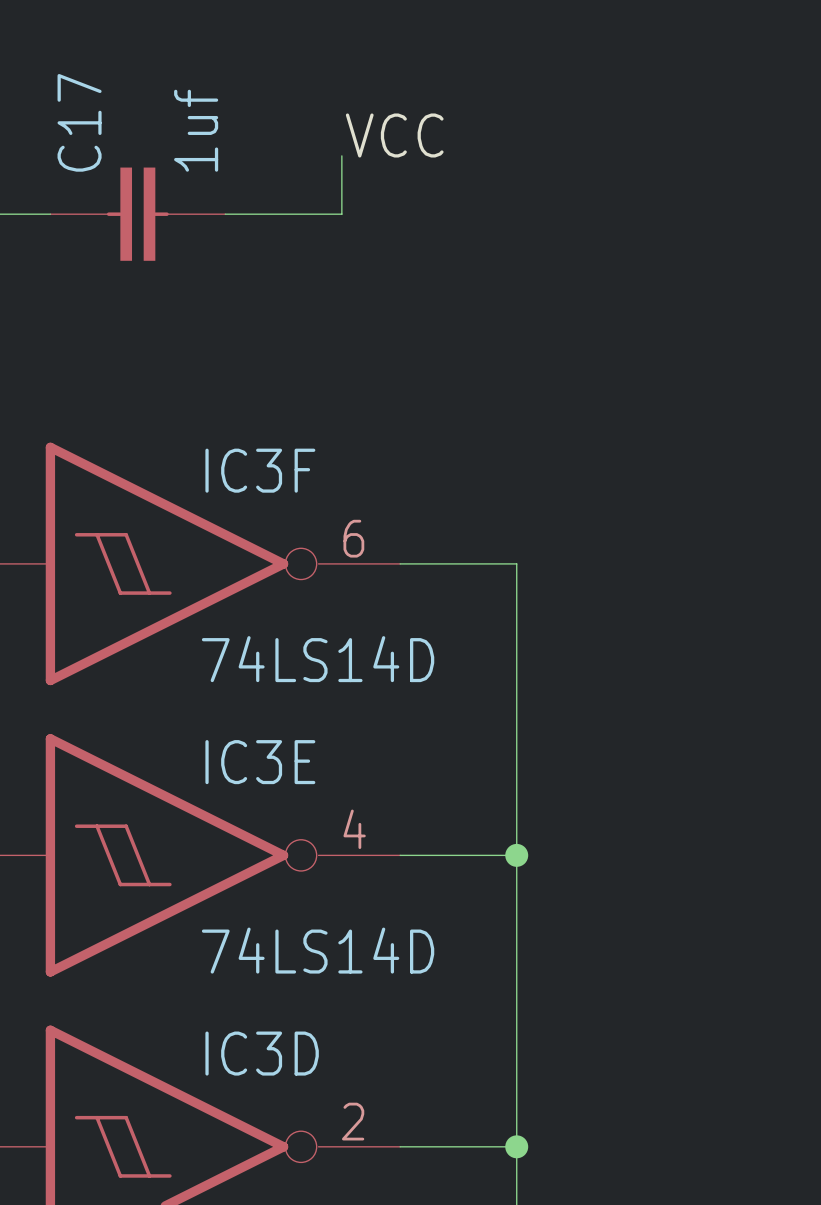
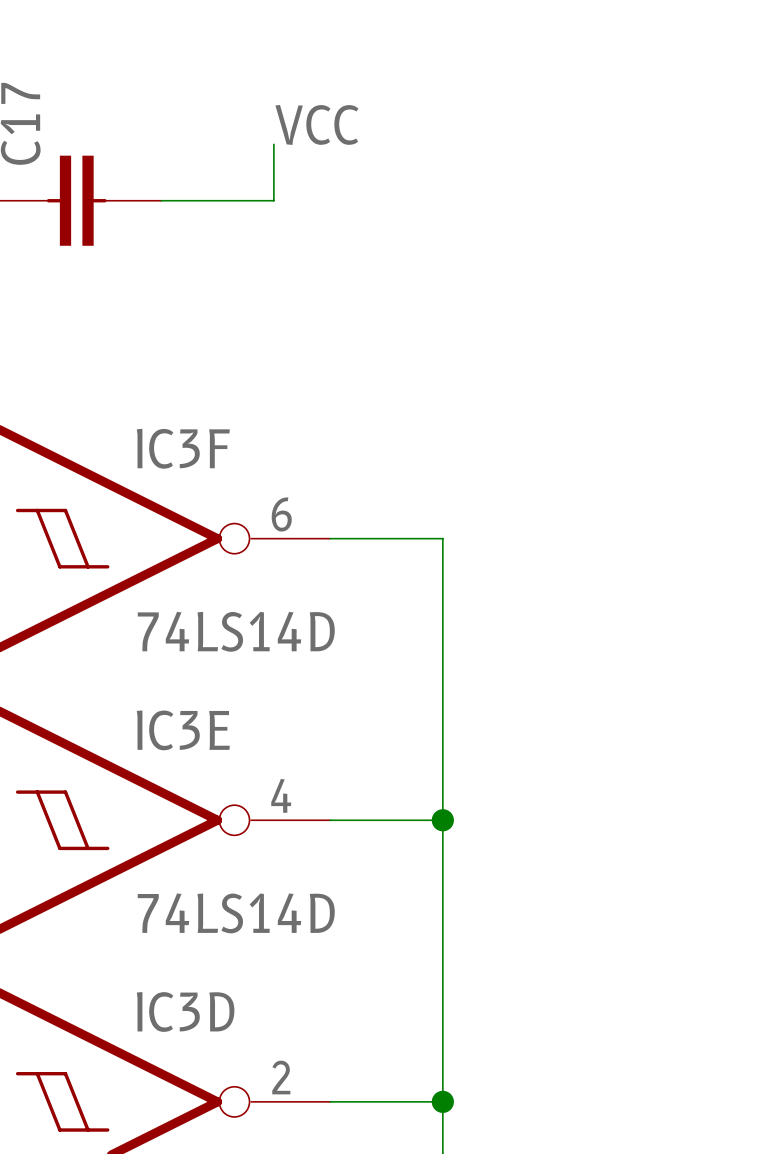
C17 value: 1uf (196, 130) -> none

